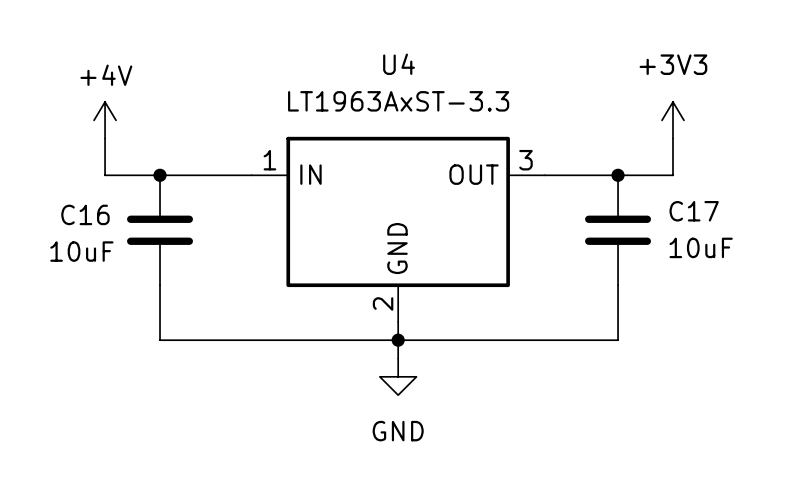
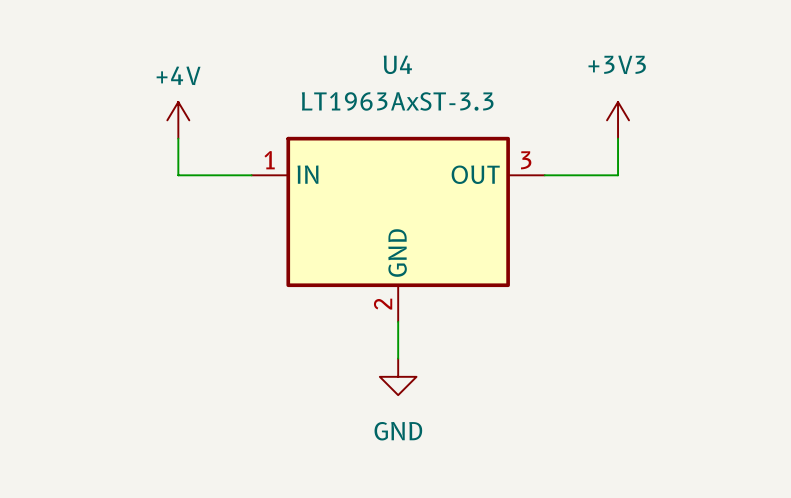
power symbol position: +4V (105, 120) -> +4V (178, 120)
power symbol position: +3V3 (672, 120) -> +3V3 (618, 120)
wire: (105, 138) (105, 175) (178, 175) -> (178, 138) (178, 175)
wire: (672, 138) (672, 175) (618, 175) -> (618, 138) (618, 175)
junction: (160, 175) -> none
junction: (618, 175) -> none
C16: 10uF (160, 230) -> none
C17: 10uF (618, 230) -> none
wire: (160, 285) (160, 340) (618, 340) (618, 285) -> none
junction: (398, 340) -> none

